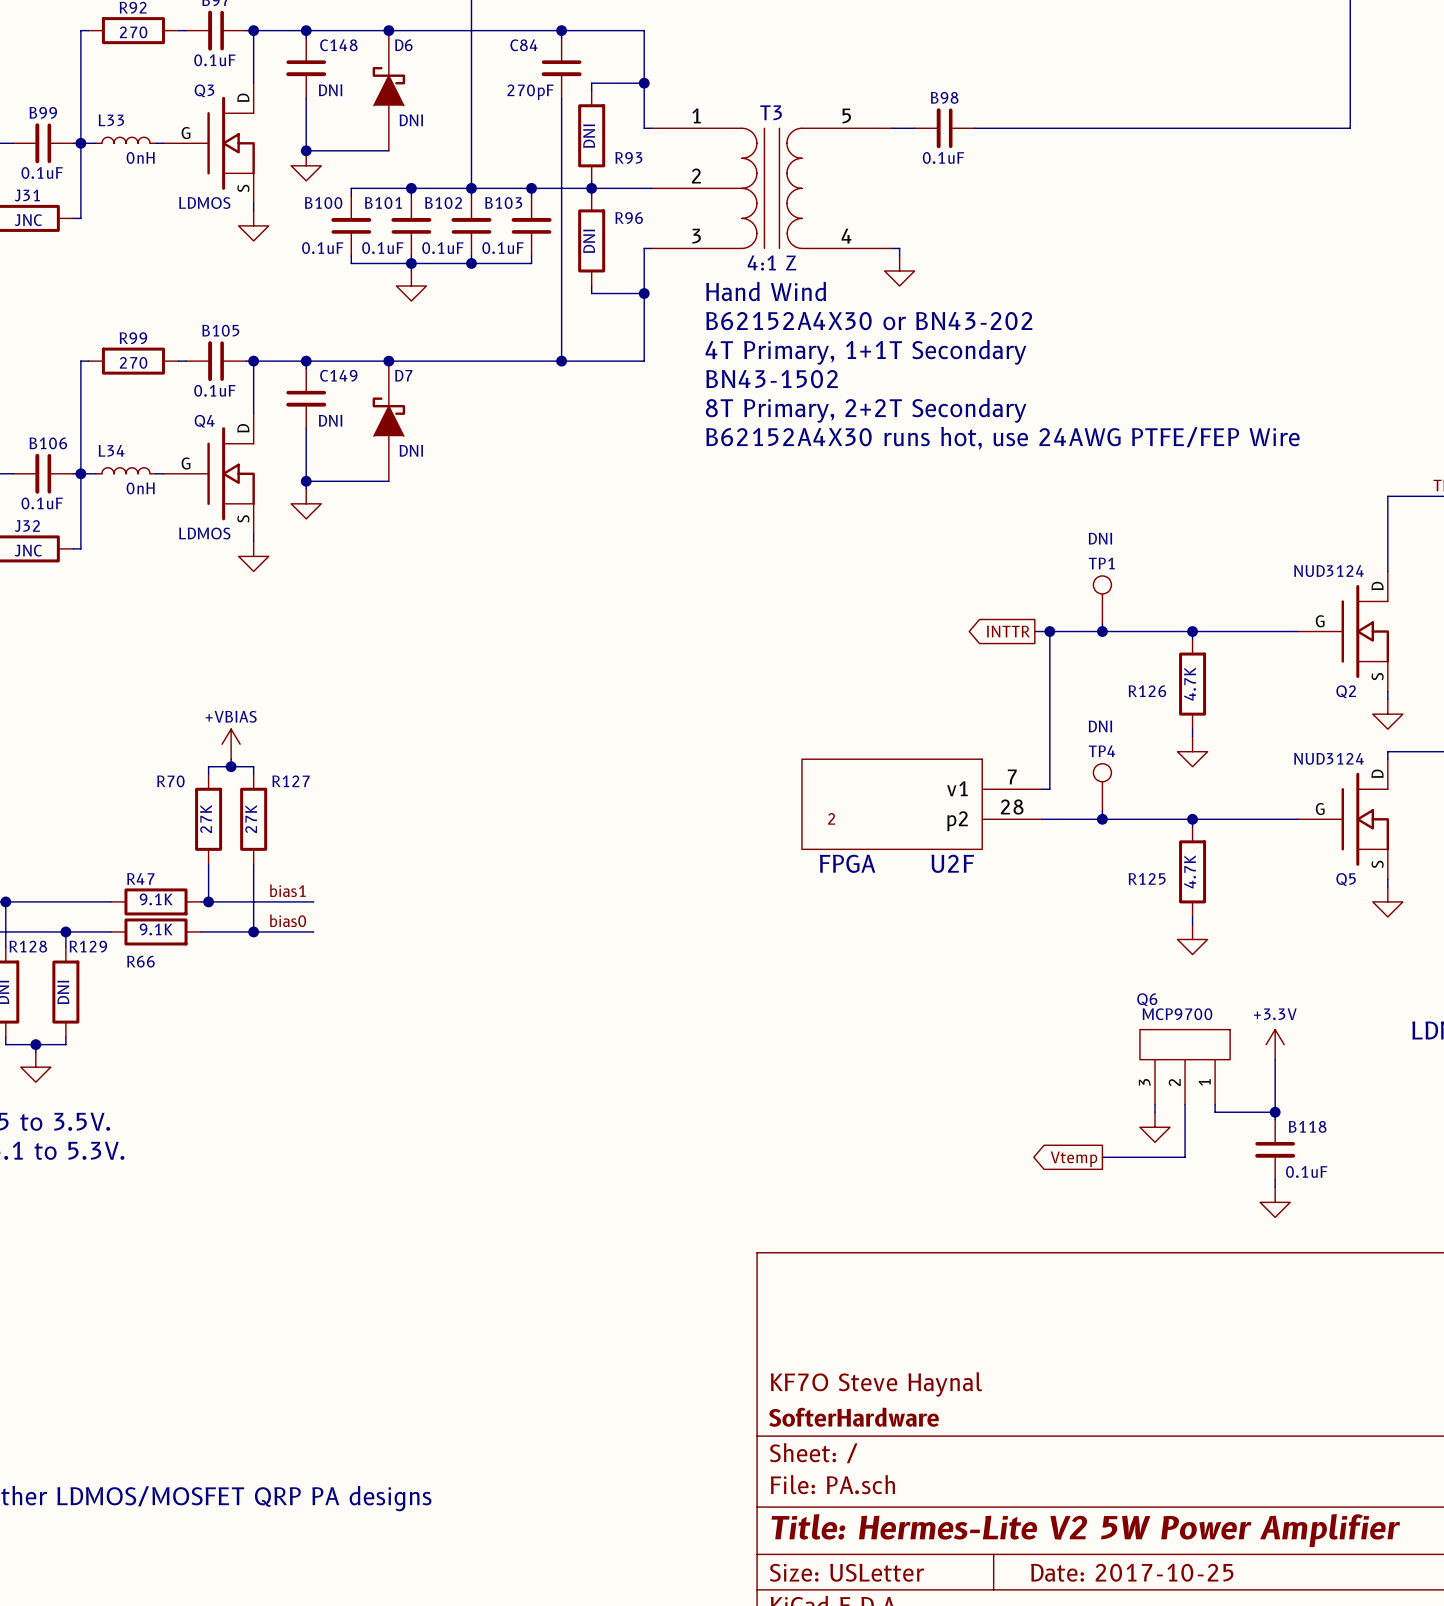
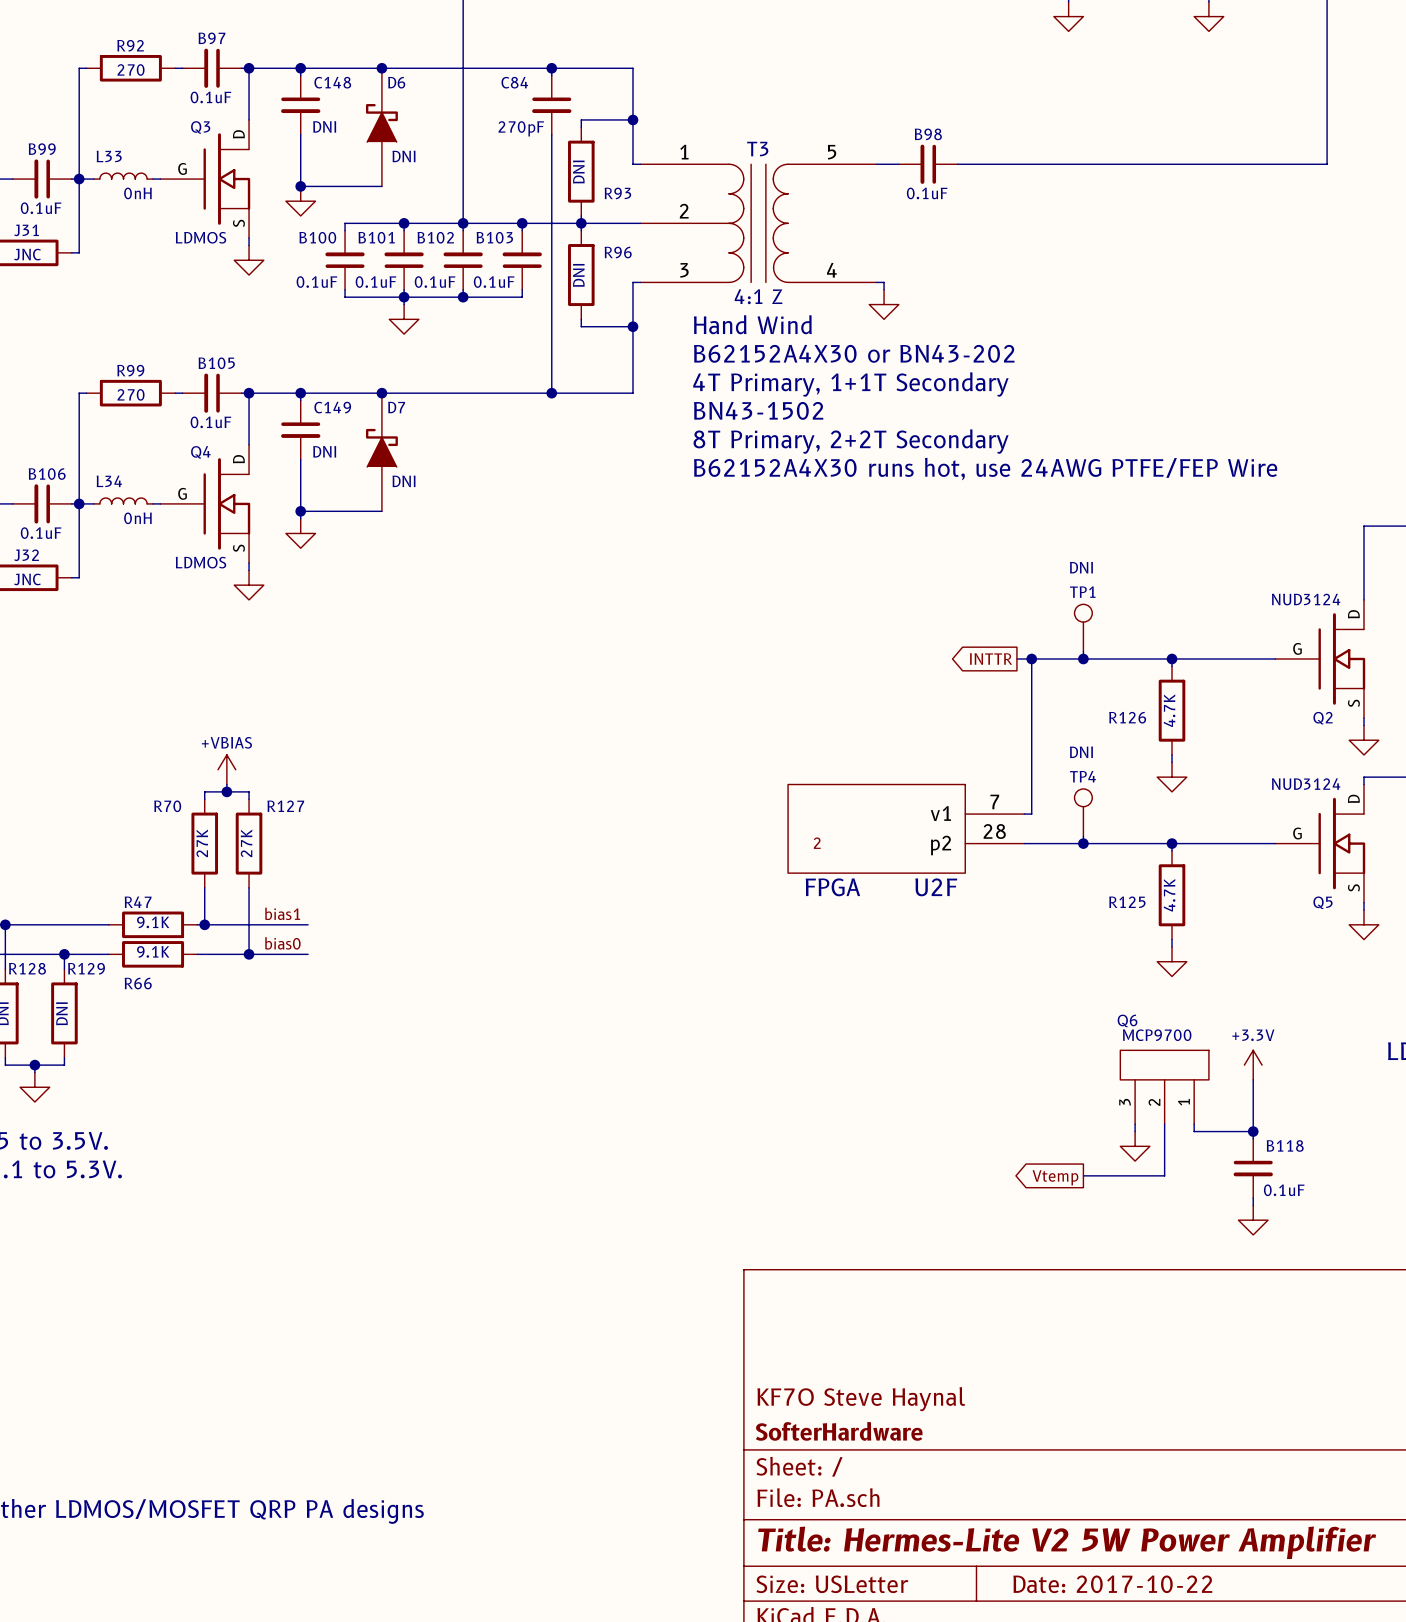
title block: Date: 2017-10-25 (1132, 1572) -> Date: 2017-10-22 (1112, 1584)

